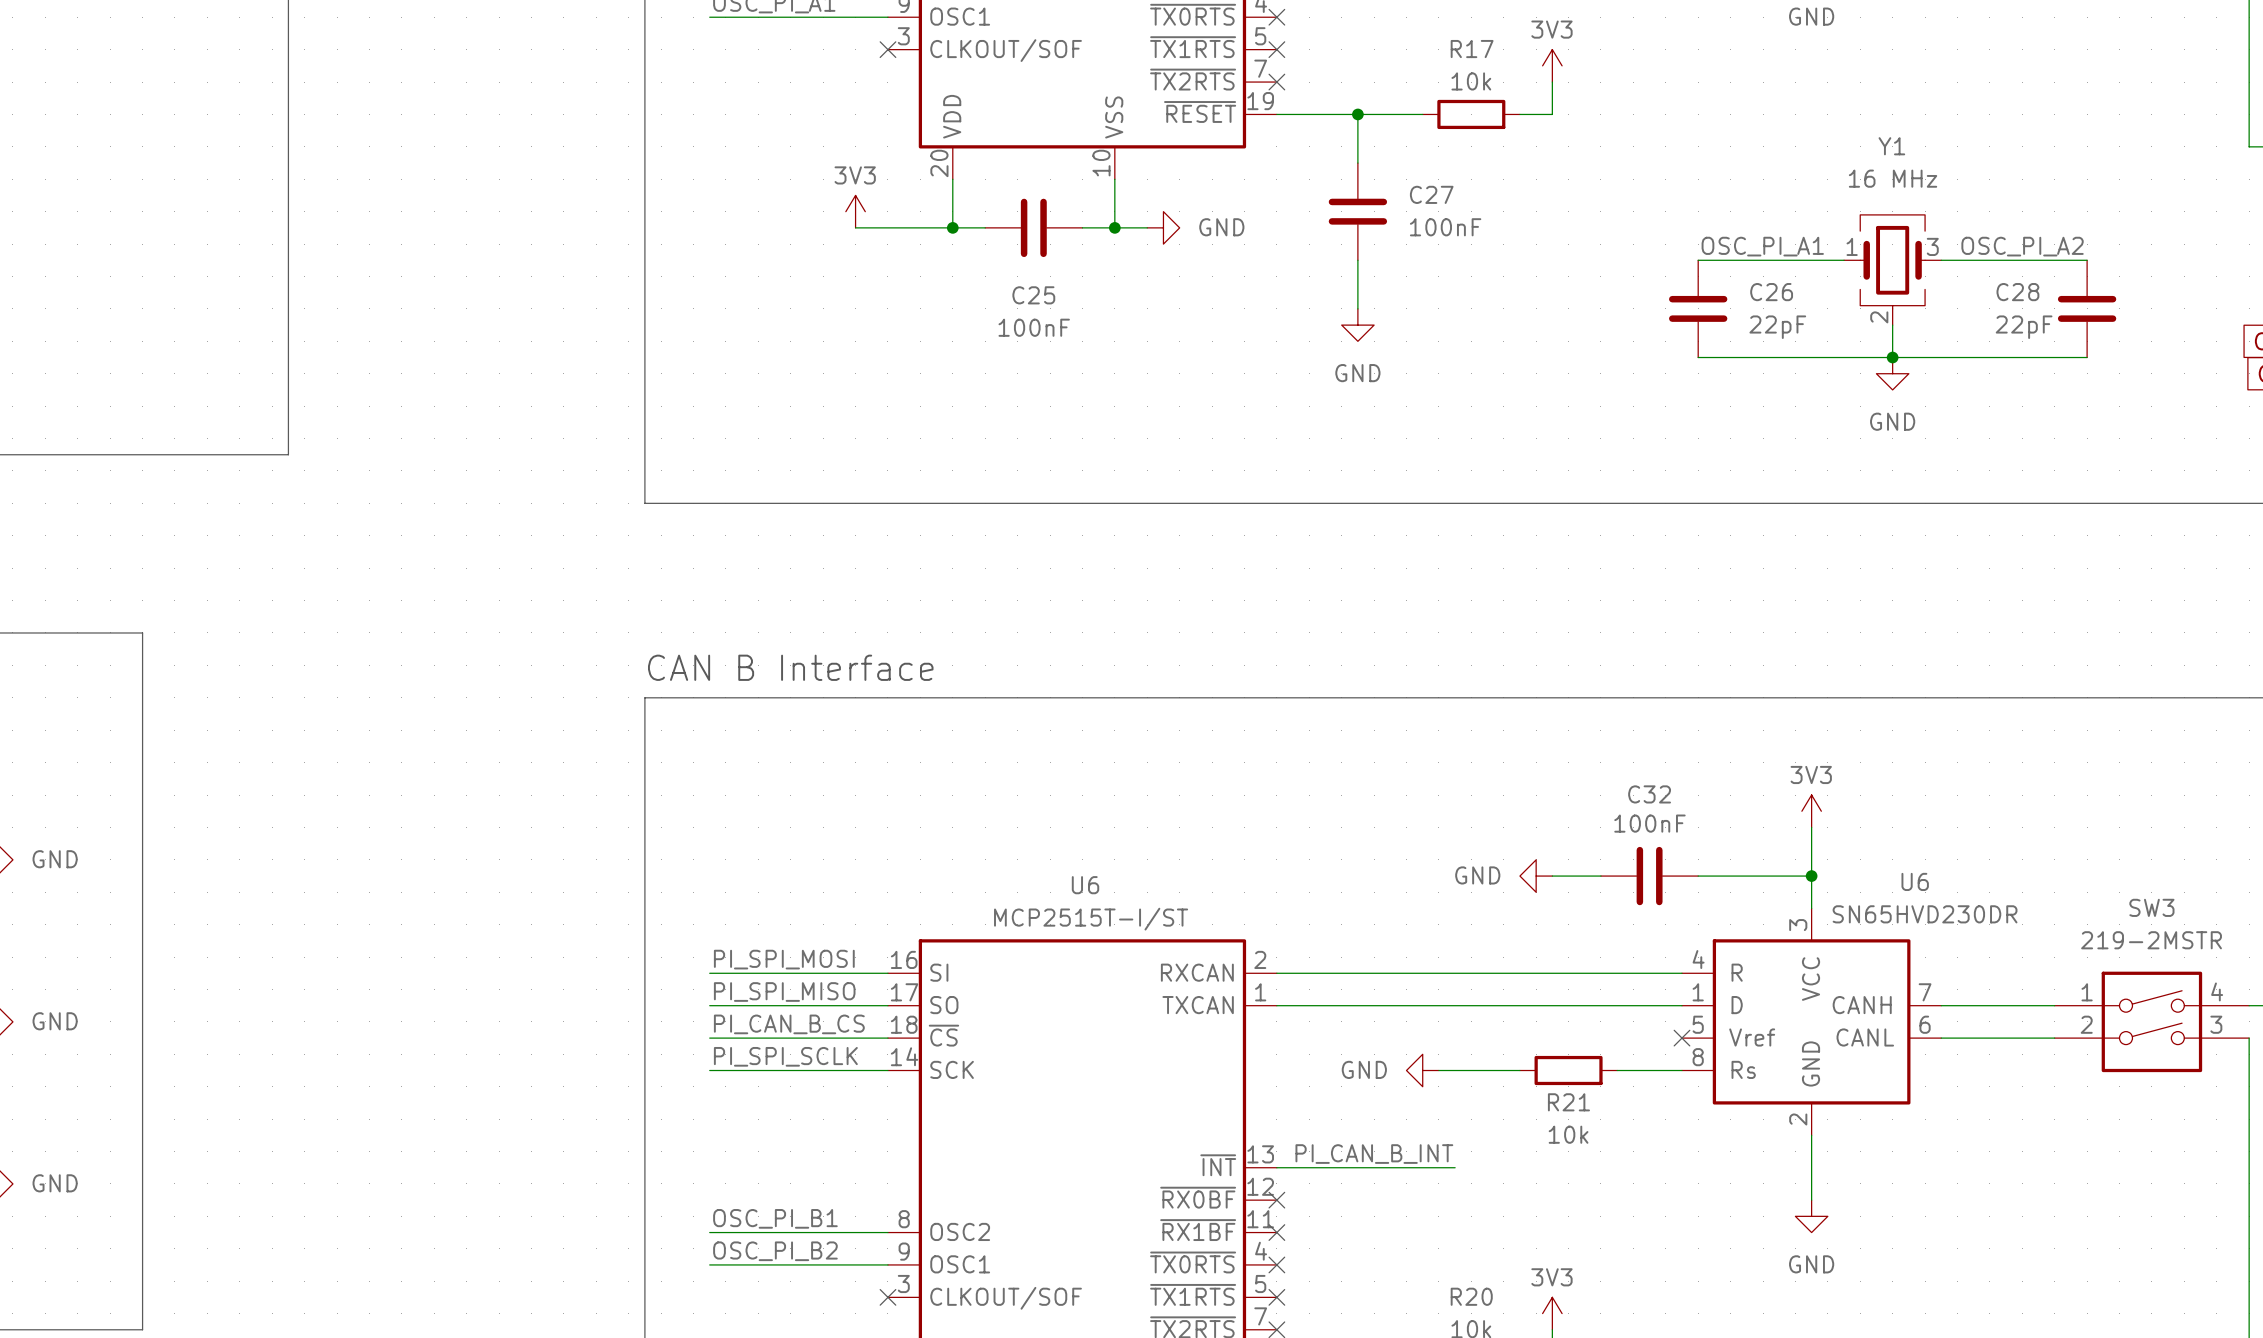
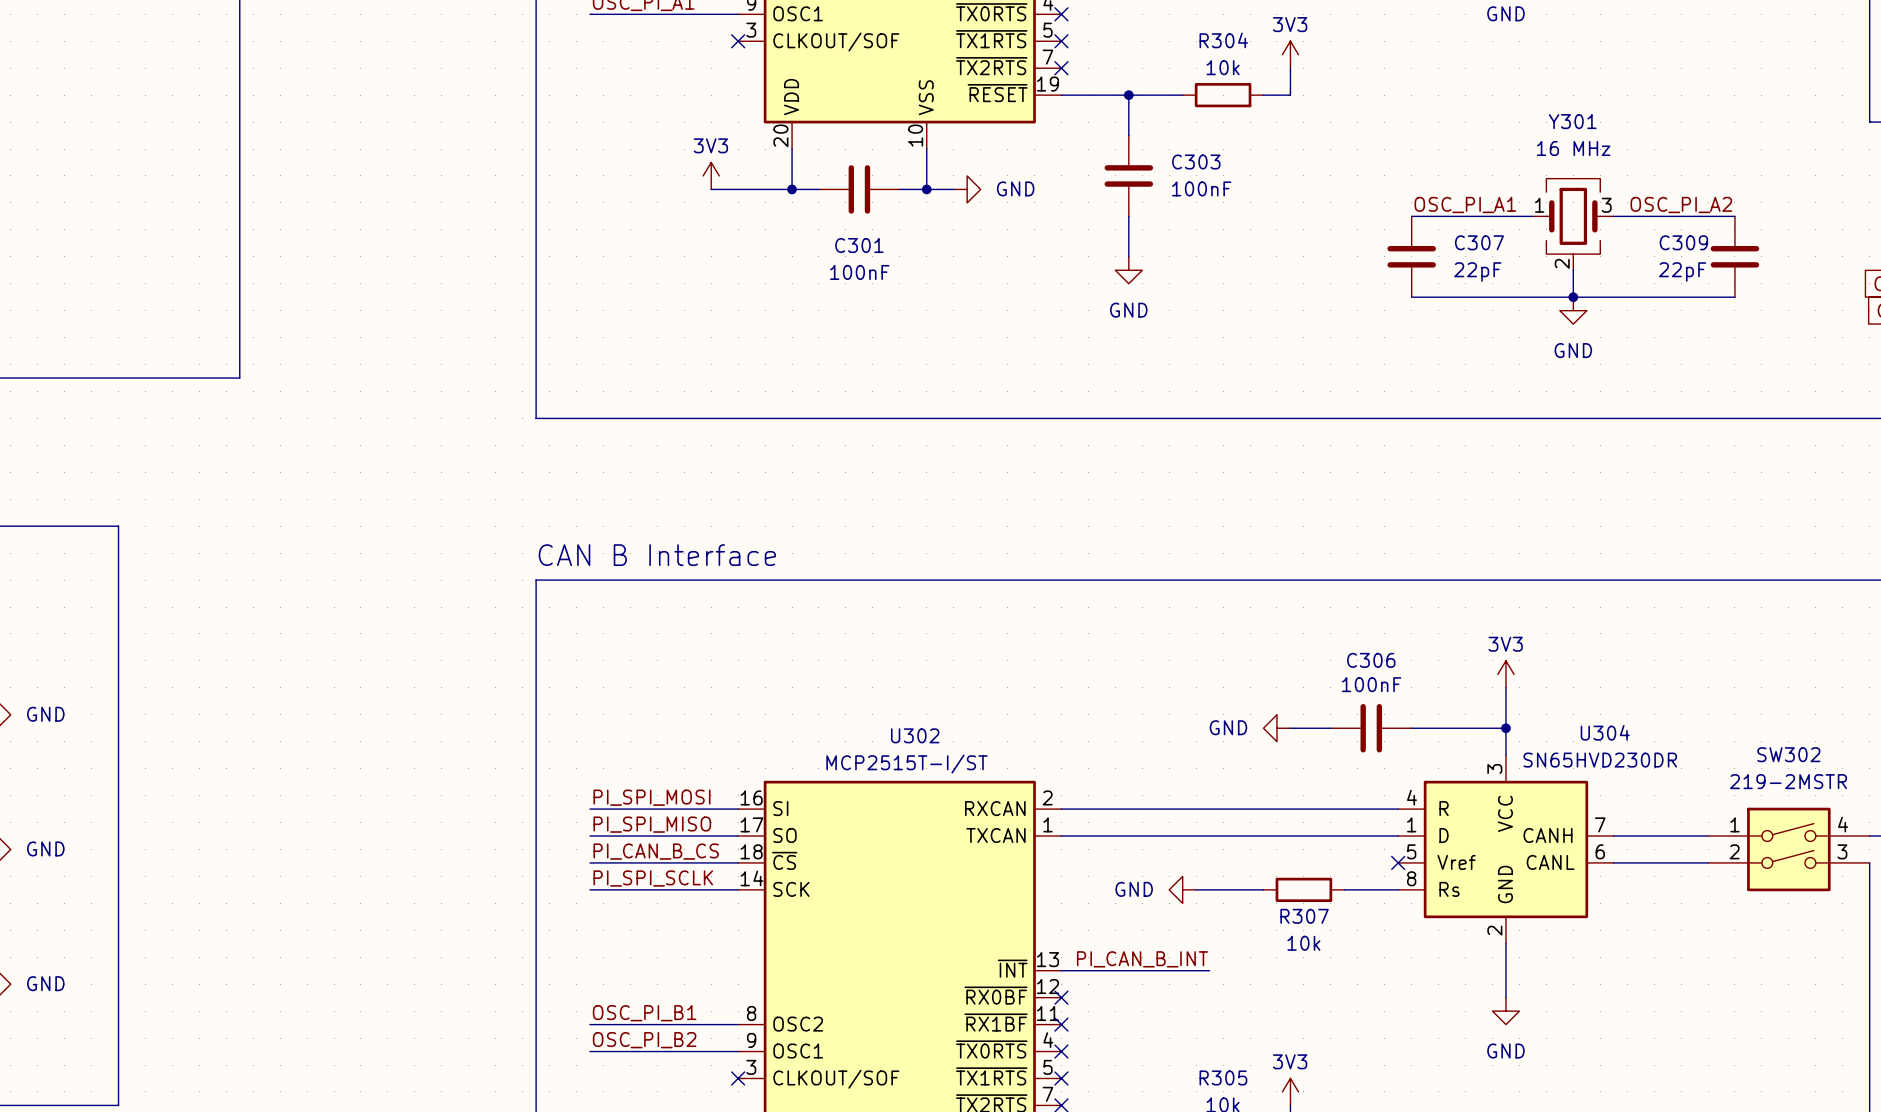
R17 name: R17 (1472, 49) -> R304 (1223, 40)
Y1 name: Y1 (1891, 146) -> Y301 (1572, 121)
C27 name: C27 (1431, 194) -> C303 (1196, 161)
C26 name: C26 (1771, 292) -> C307 (1479, 242)
C28 name: C28 (2017, 292) -> C309 (1683, 242)
C25 name: C25 (1033, 295) -> C301 (859, 245)
C32 name: C32 (1649, 794) -> C306 (1371, 660)
U6 name: U6 (1915, 881) -> U304 (1605, 732)
U6 name: U6 (1085, 885) -> U302 (915, 735)
SW3 name: SW3 (2151, 907) -> SW302 (1788, 754)
R21 name: R21 (1568, 1102) -> R307 (1304, 916)
R20 name: R20 (1471, 1296) -> R305 (1223, 1077)

